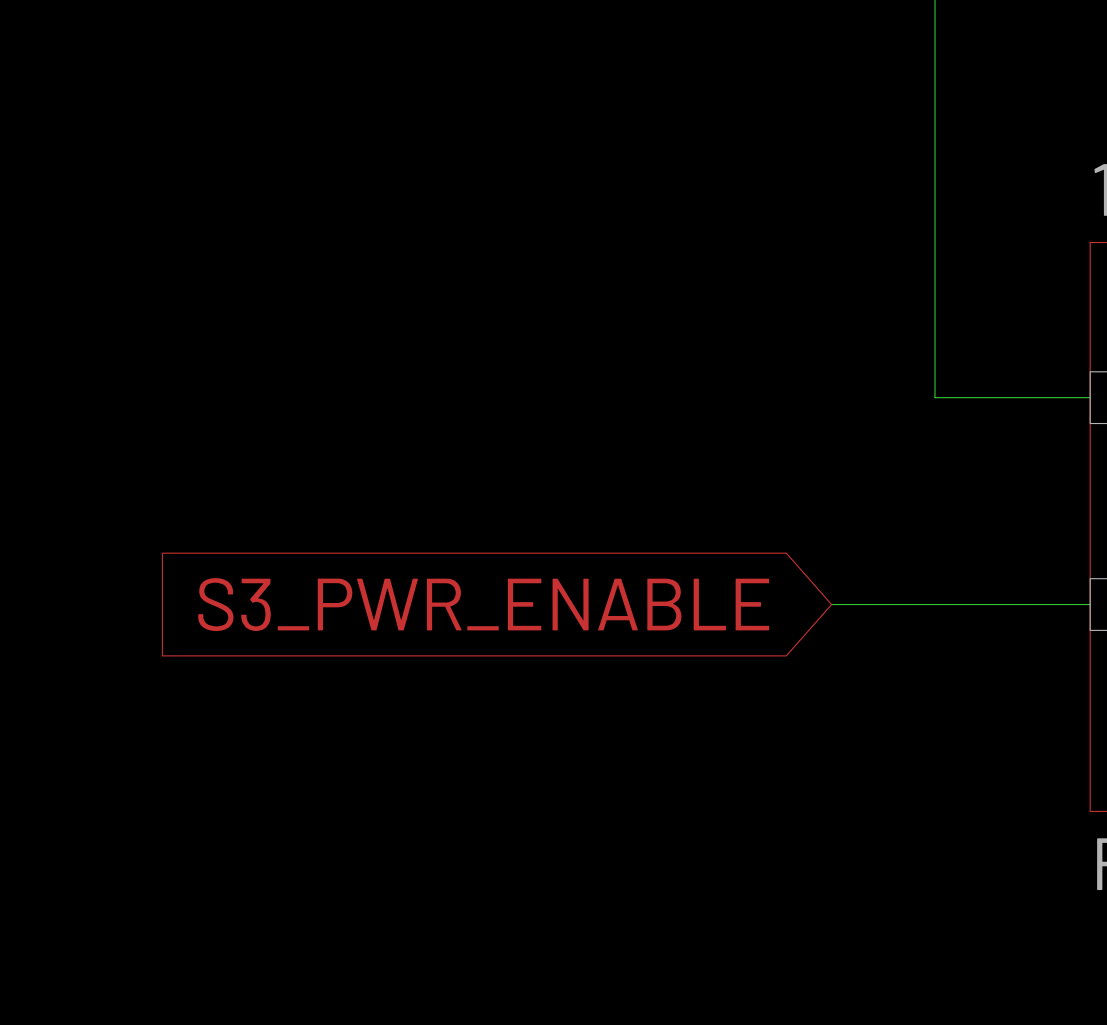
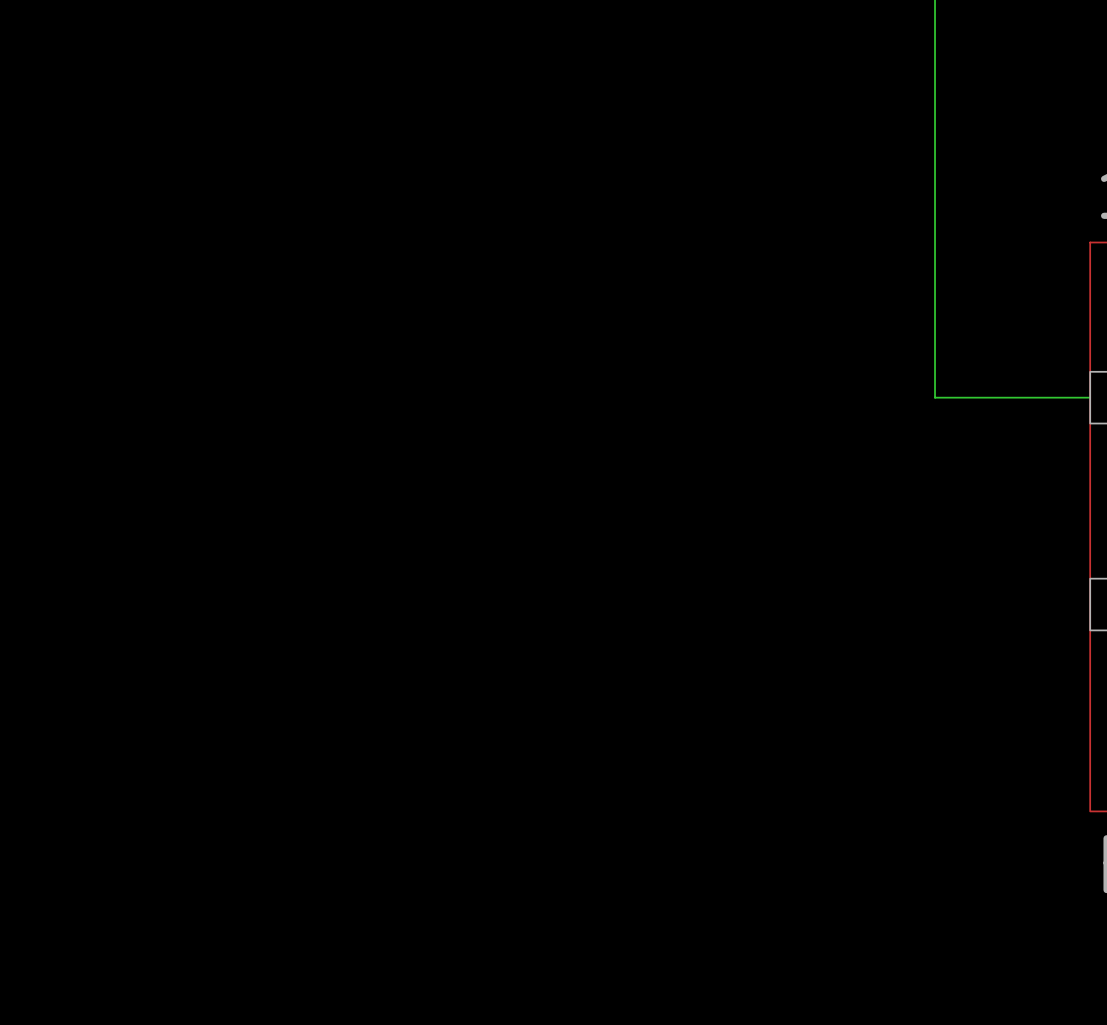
global label: S3_PWR_ENABLE (483, 604) -> none
wire: (831, 604) (1090, 604) -> none

